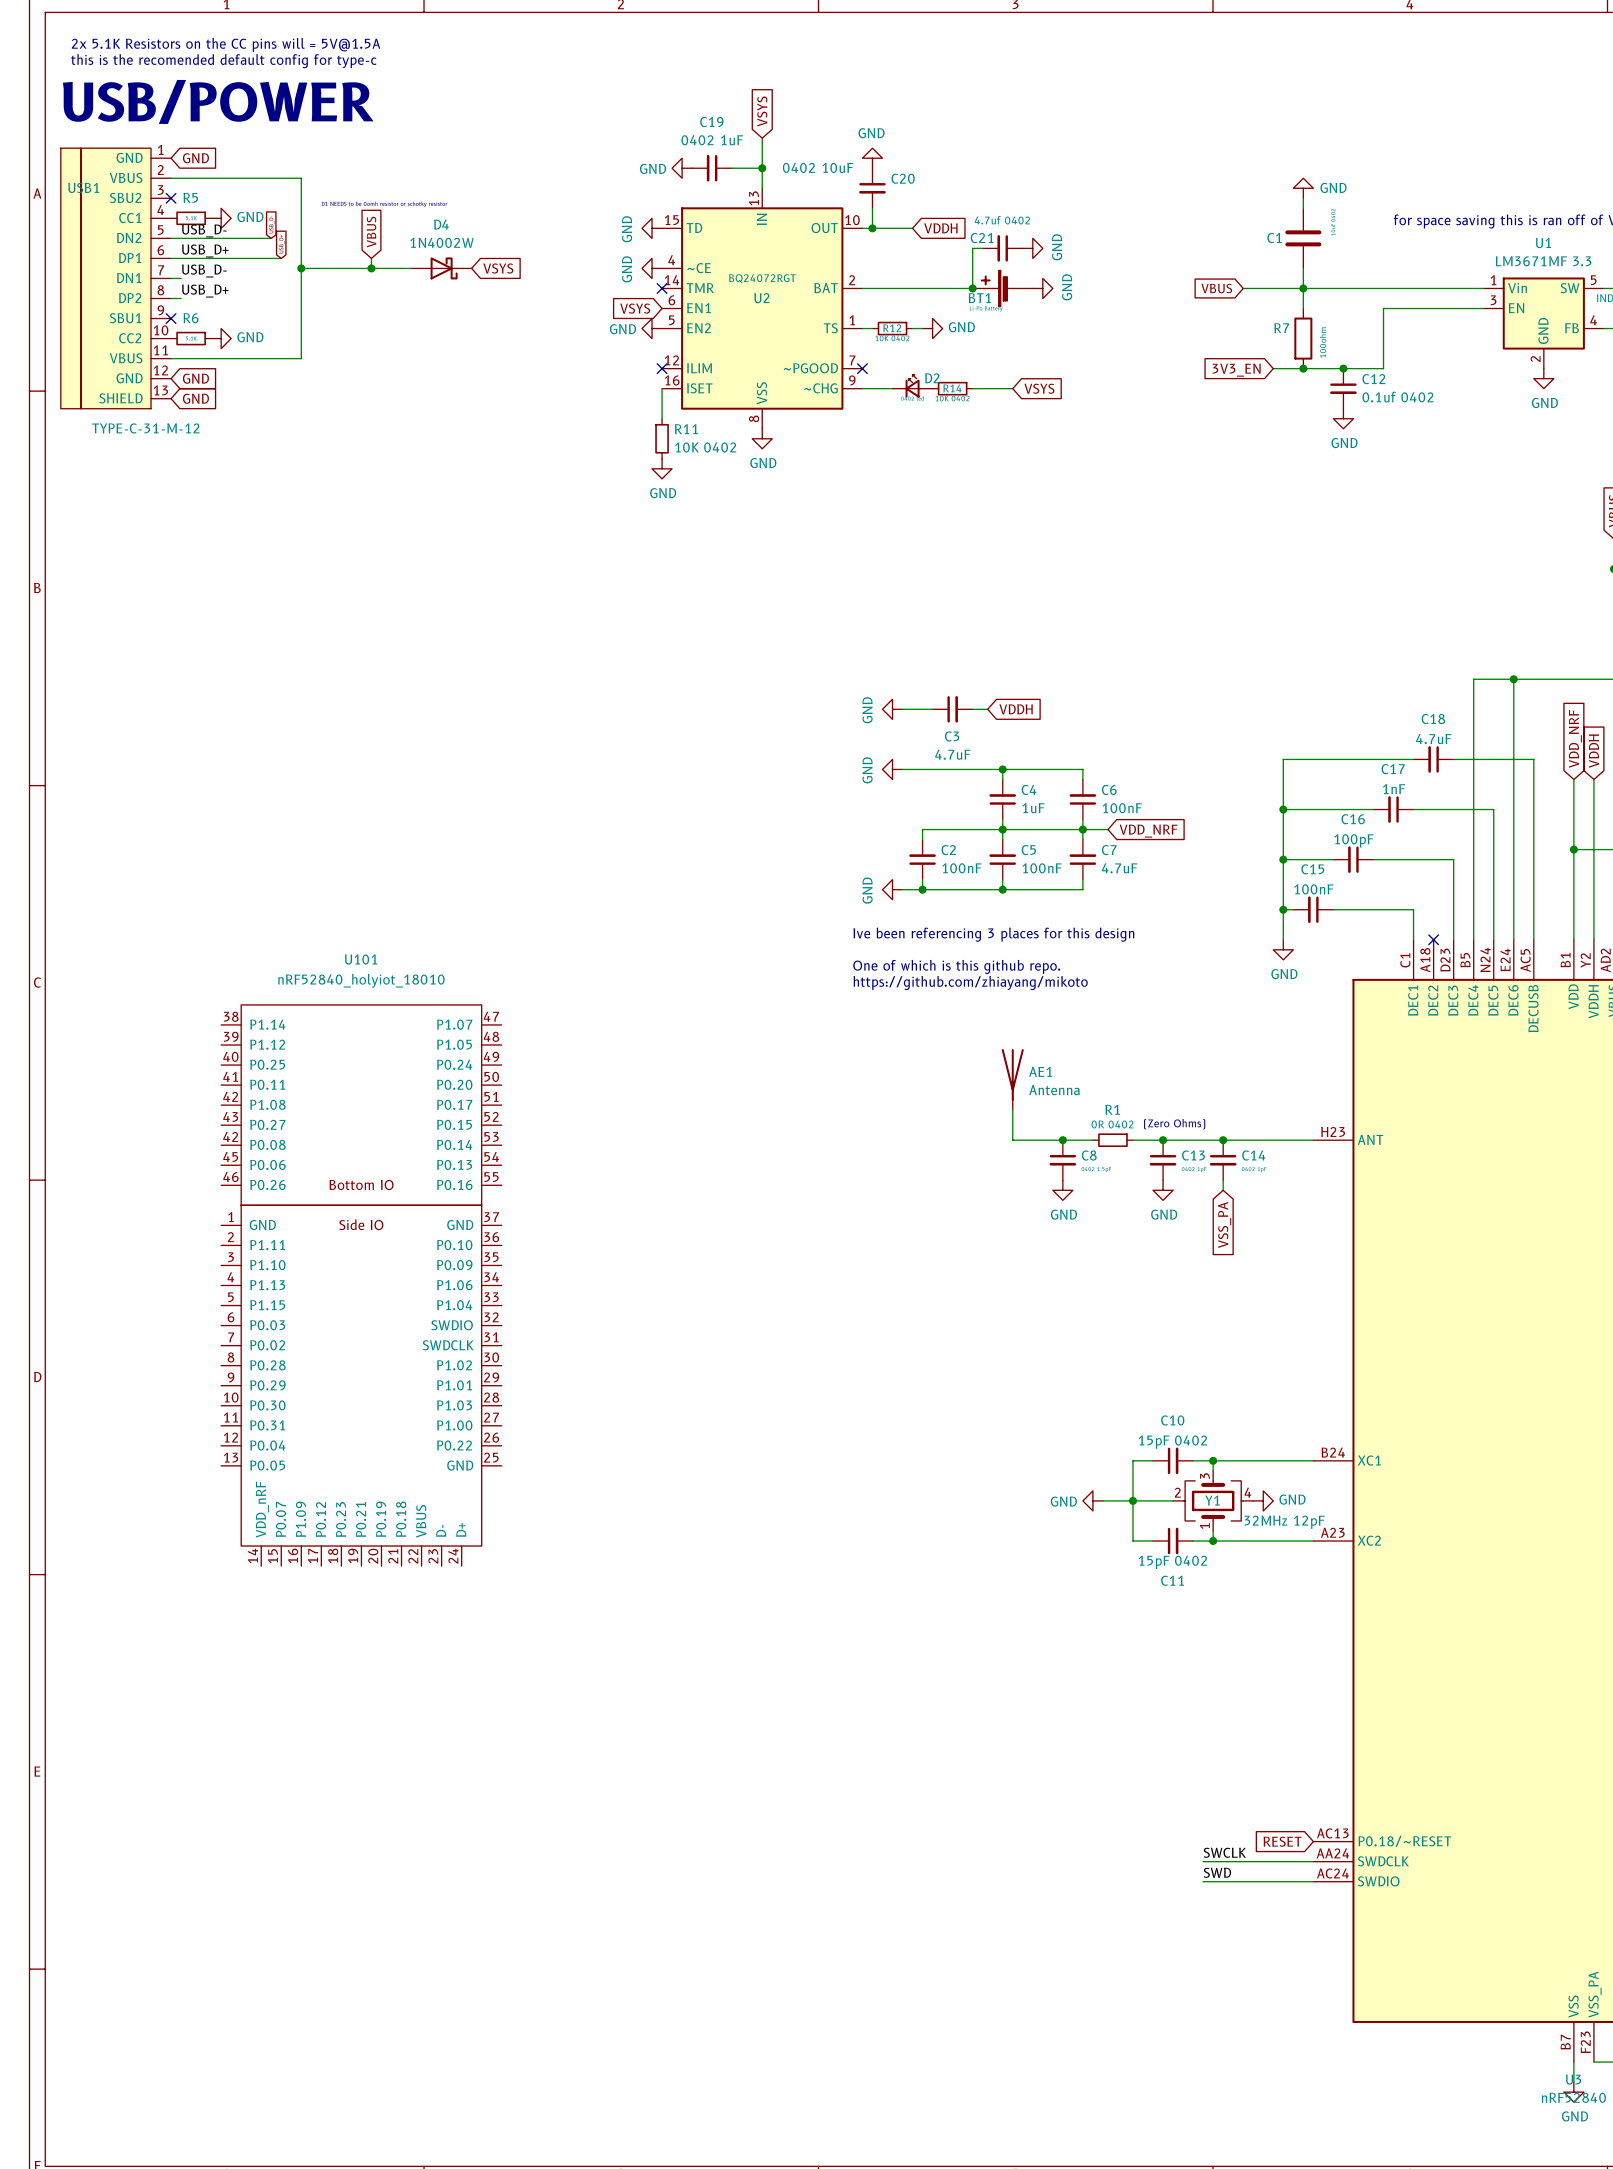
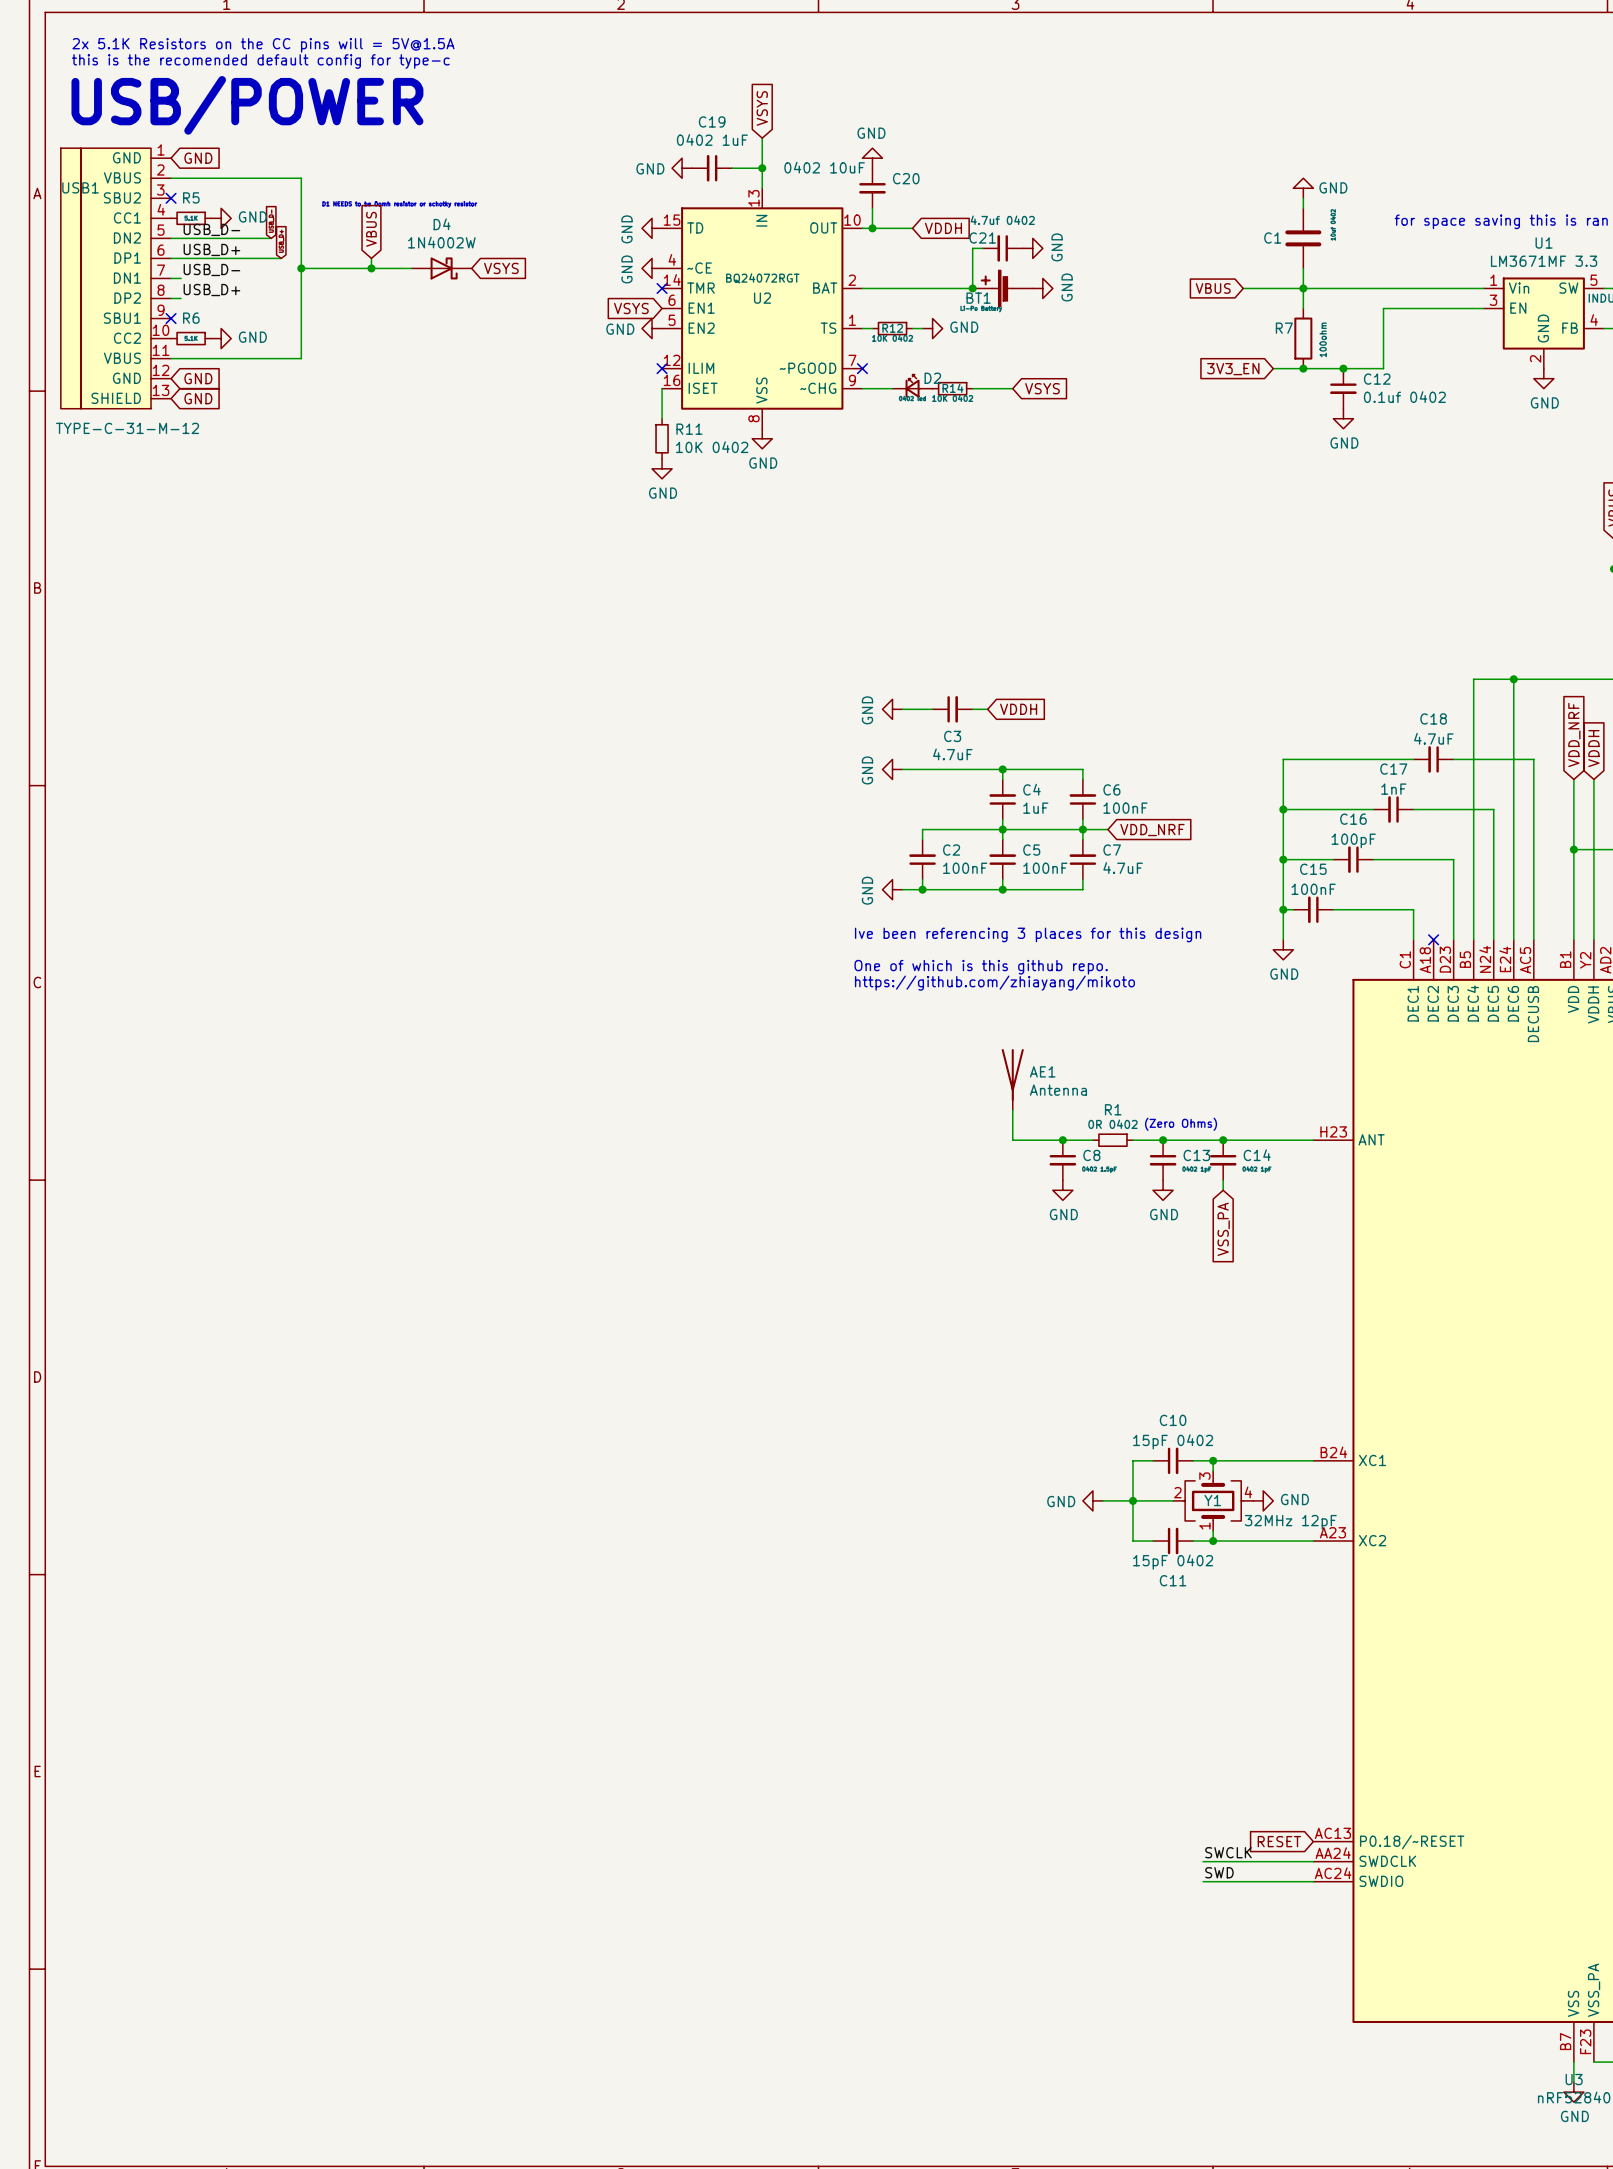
U101: nRF52840_holyiot_18010 (361, 1285) -> none

